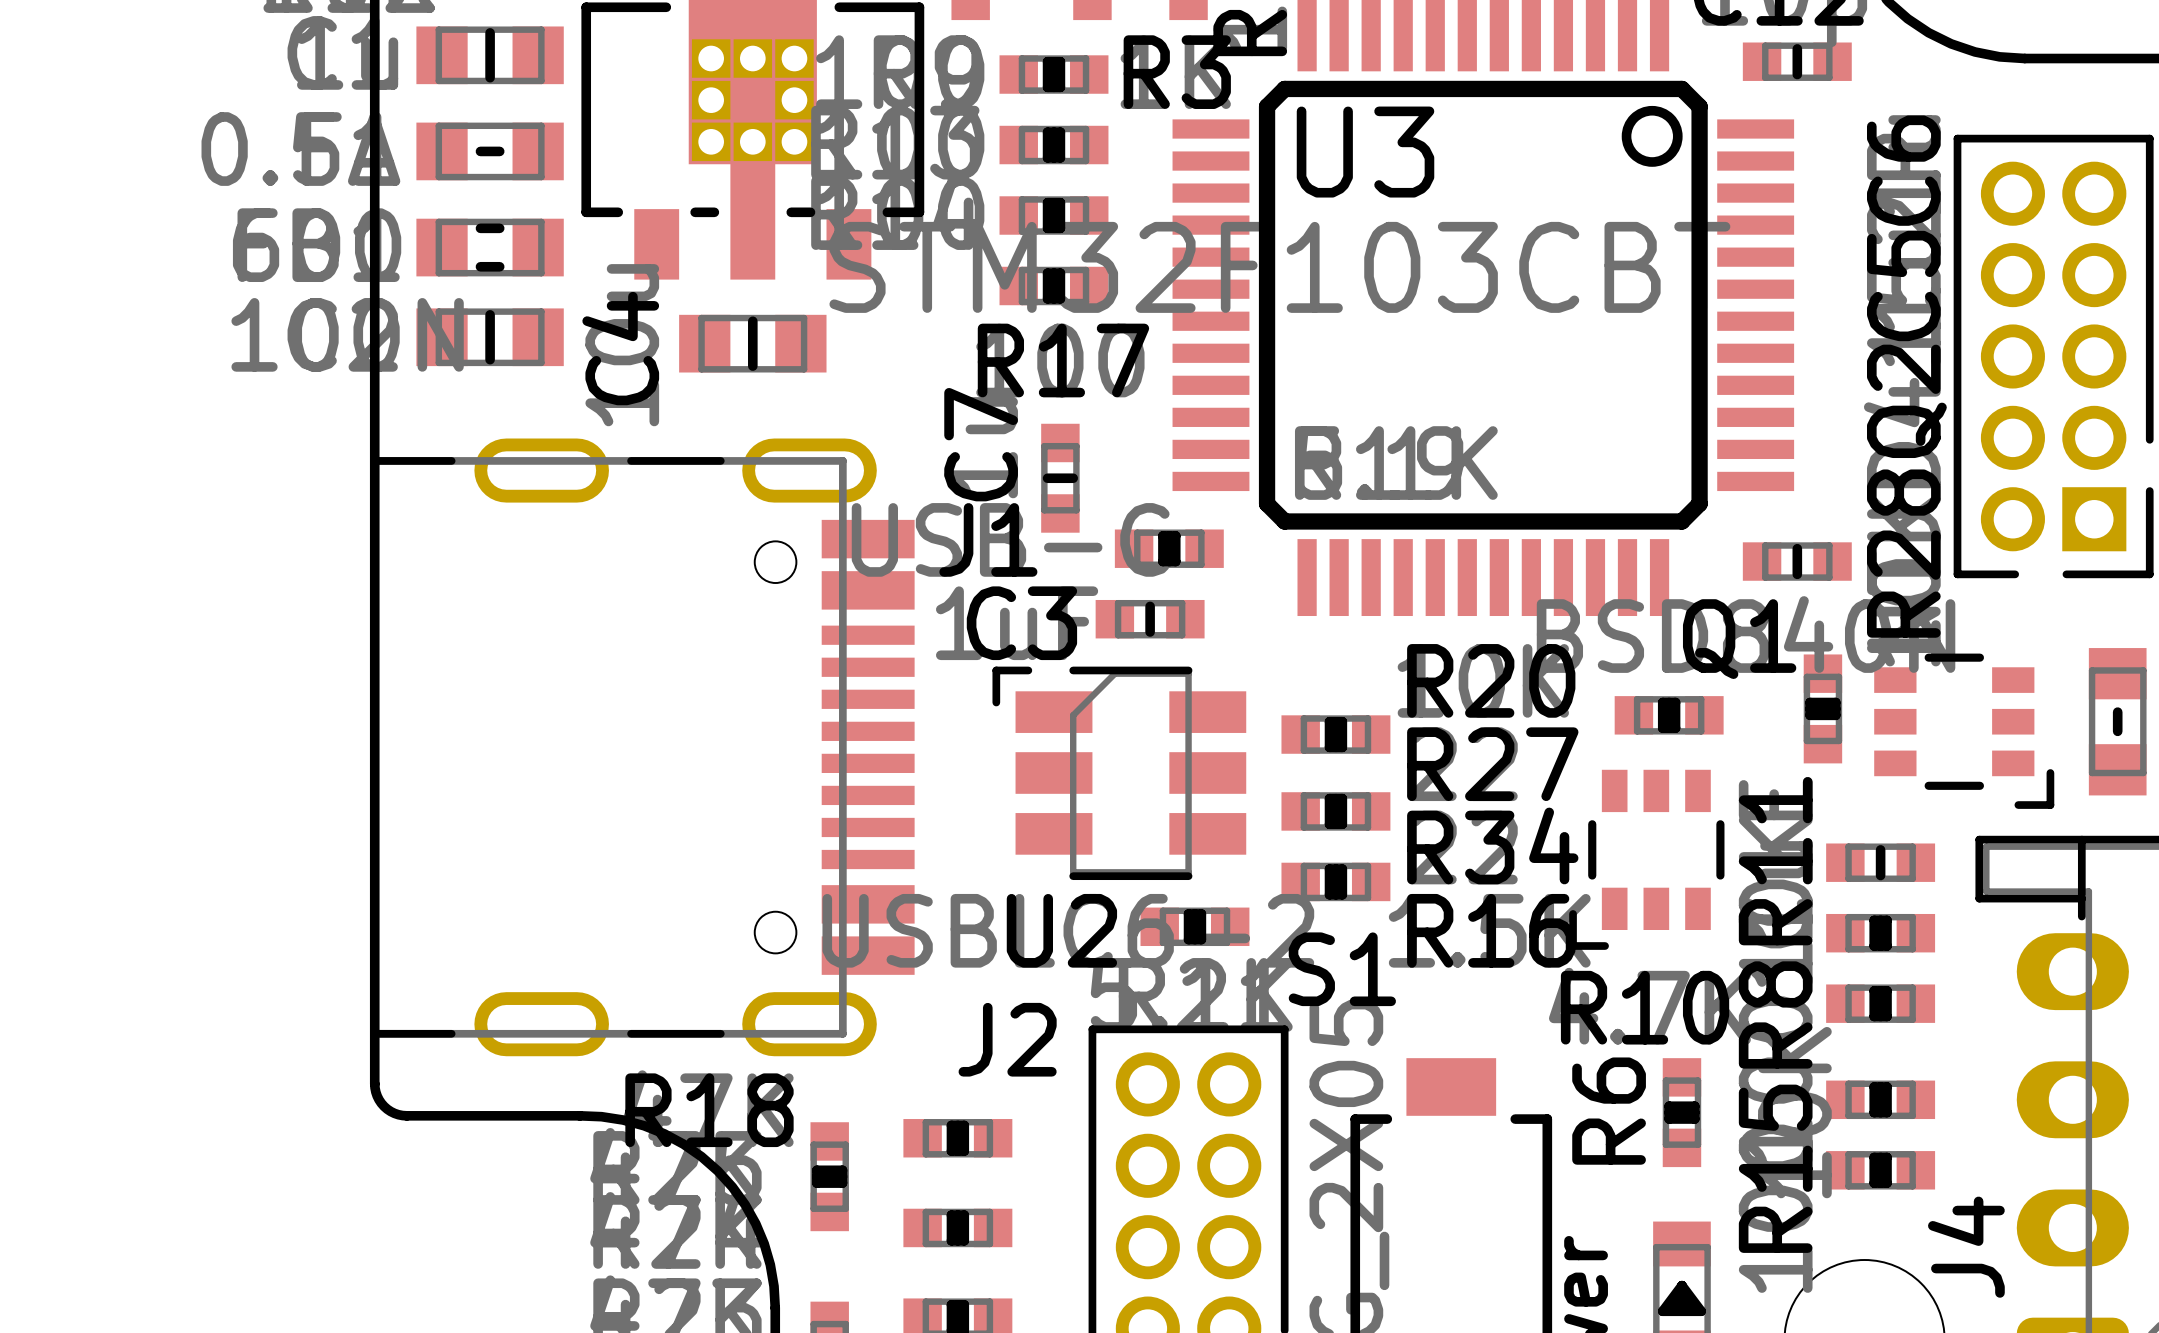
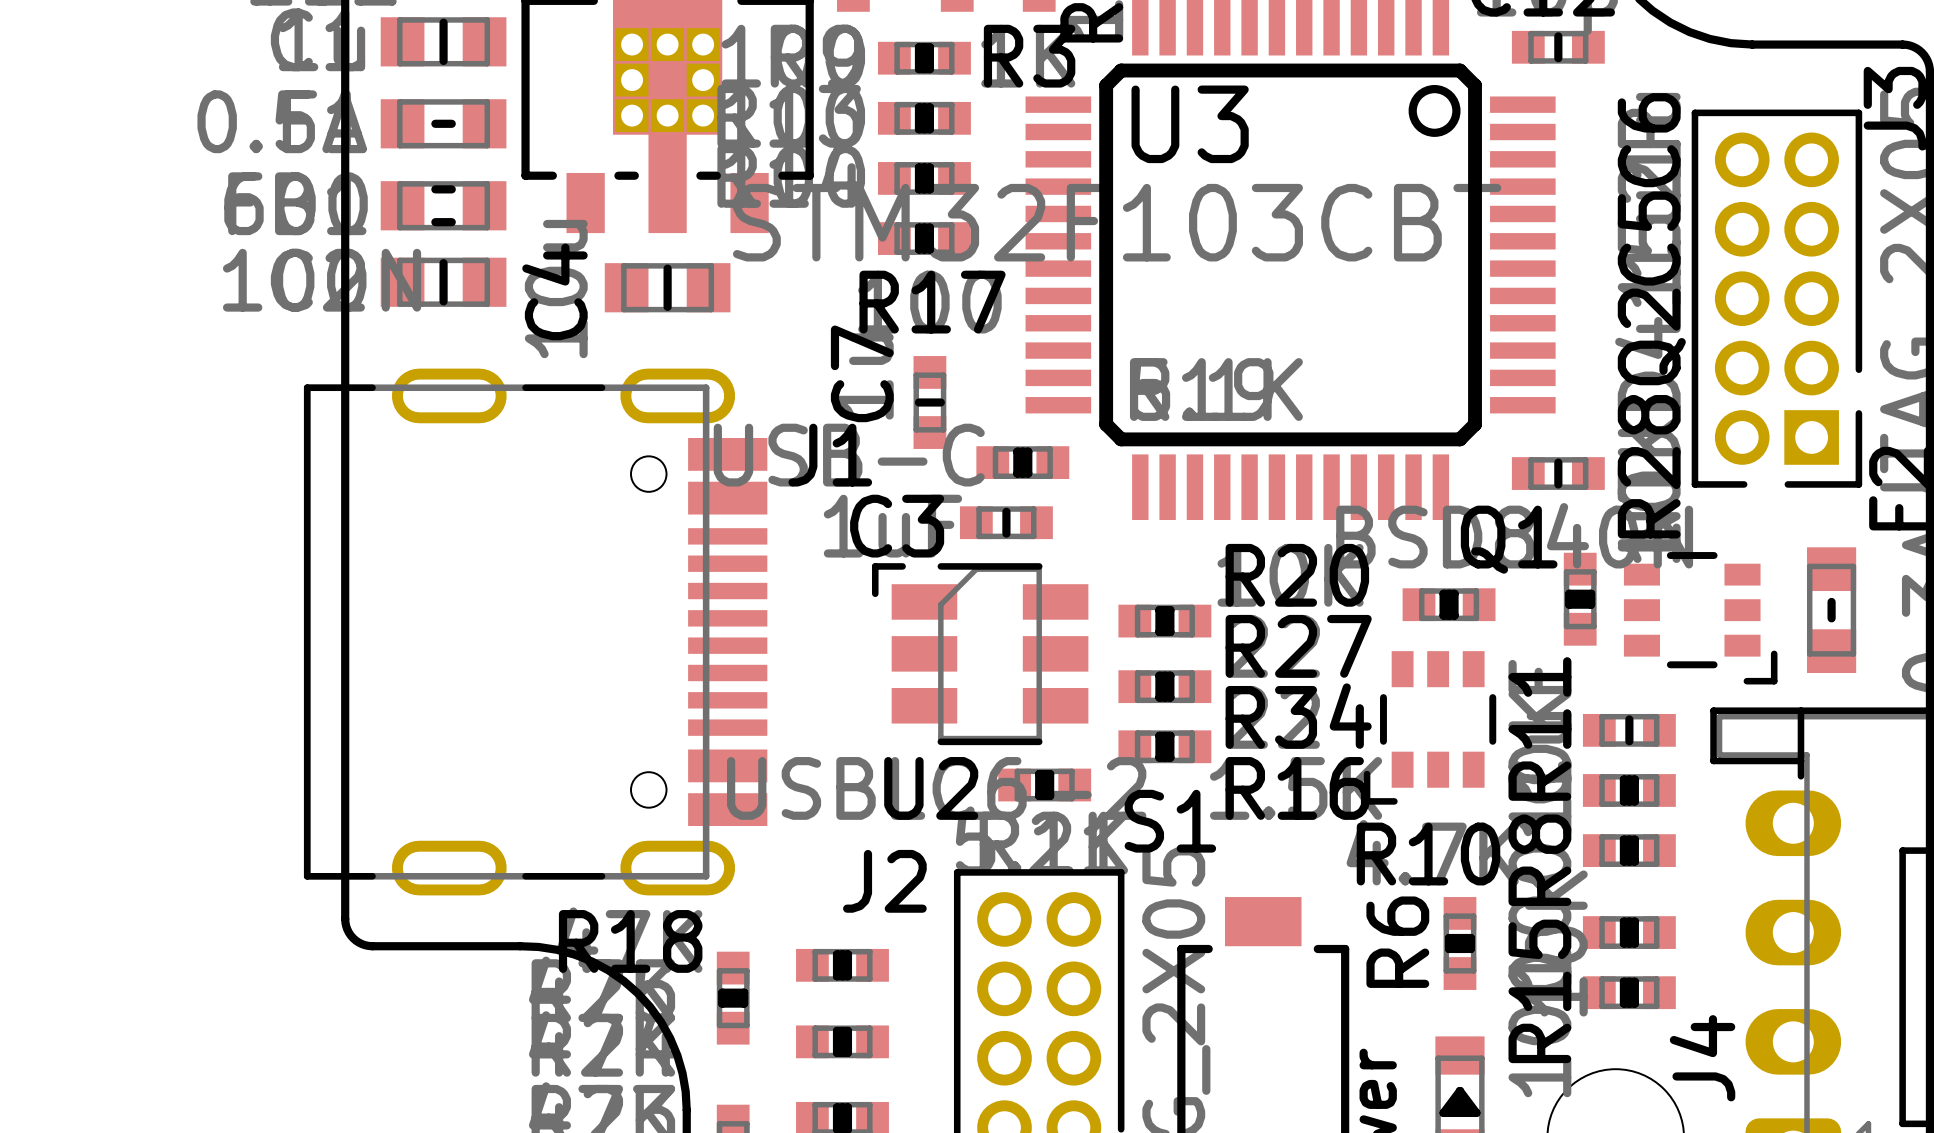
J1 position: (642, 747) -> (535, 632)

